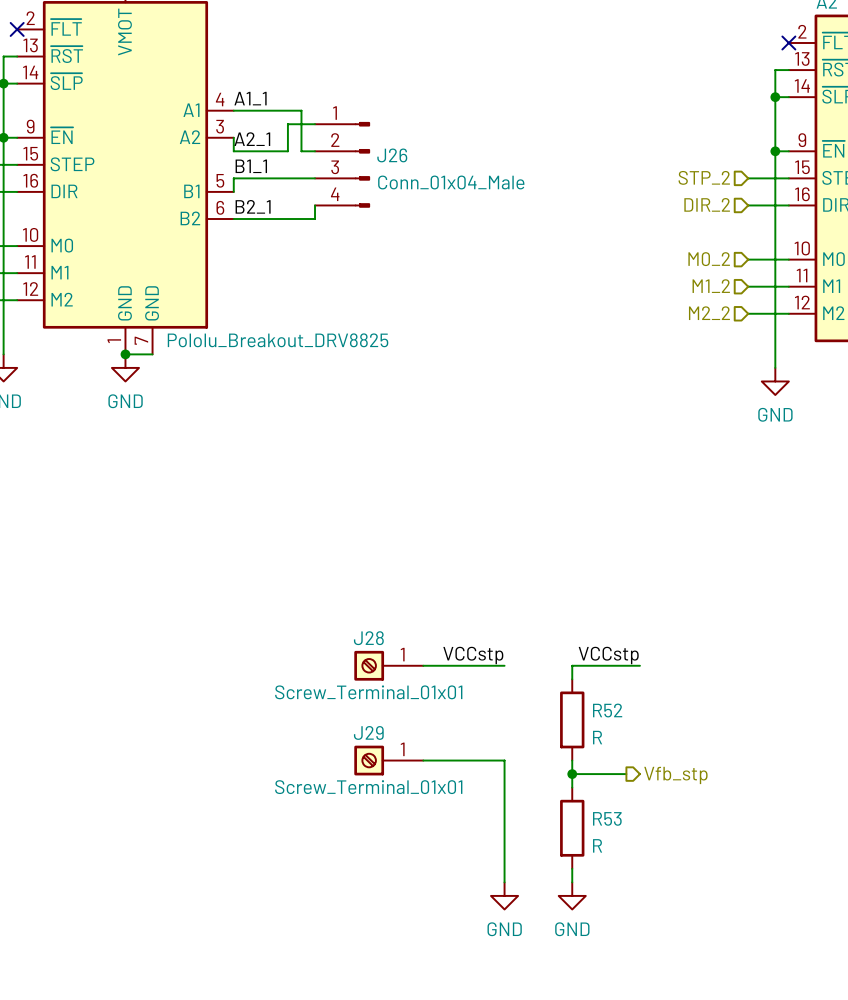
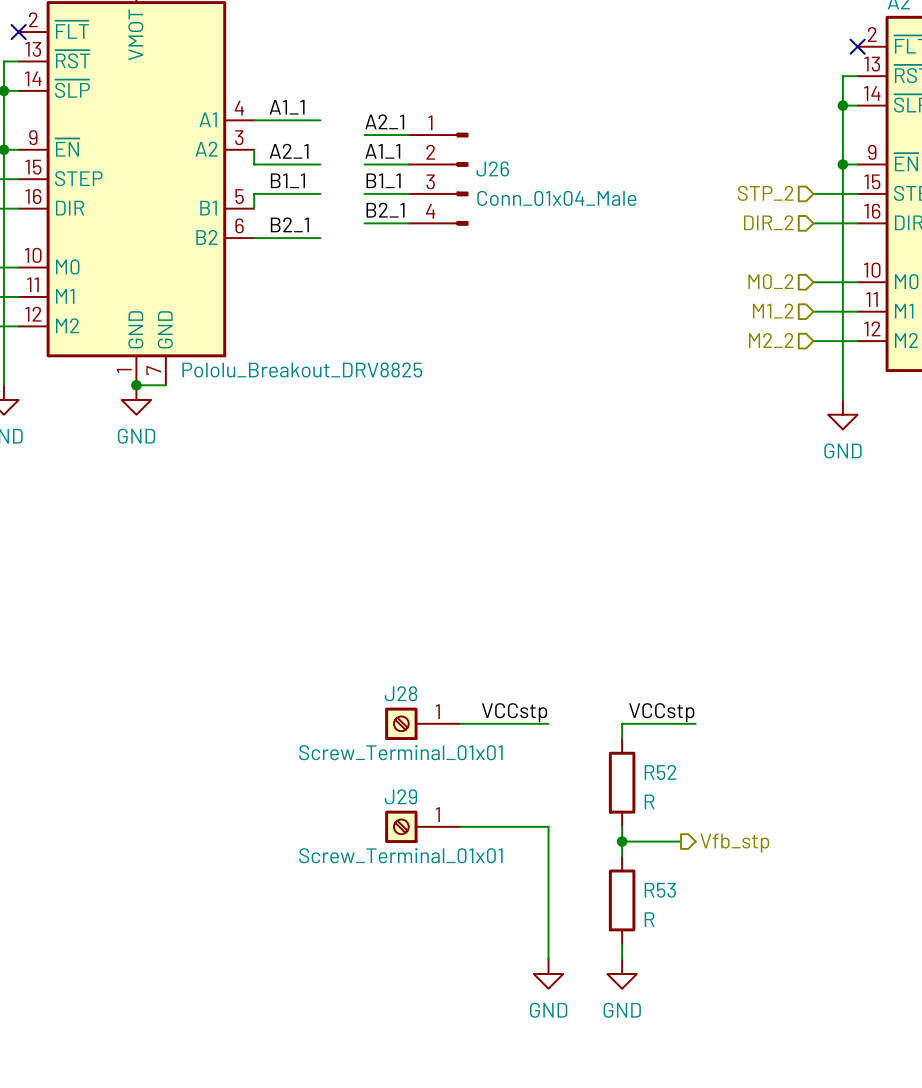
label position: A1_1 (250, 98) -> A1_1 (287, 107)
wire: (294, 110) (301, 110) (301, 151) (315, 151) -> none
label: none -> A2_1 (384, 121)
wire: (315, 124) (287, 124) (287, 151) -> (320, 164) (313, 164)
label position: A2_1 (252, 139) -> A2_1 (289, 151)
label: none -> A1_1 (382, 151)
J26 position: (342, 164) -> (438, 179)
label position: B1_1 (251, 166) -> B1_1 (287, 180)
label: none -> B1_1 (383, 180)
wire: (294, 178) (315, 178) -> none
label: none -> B2_1 (385, 210)
wire: (315, 205) (315, 219) (294, 219) -> none
label position: B2_1 (253, 206) -> B2_1 (289, 224)

